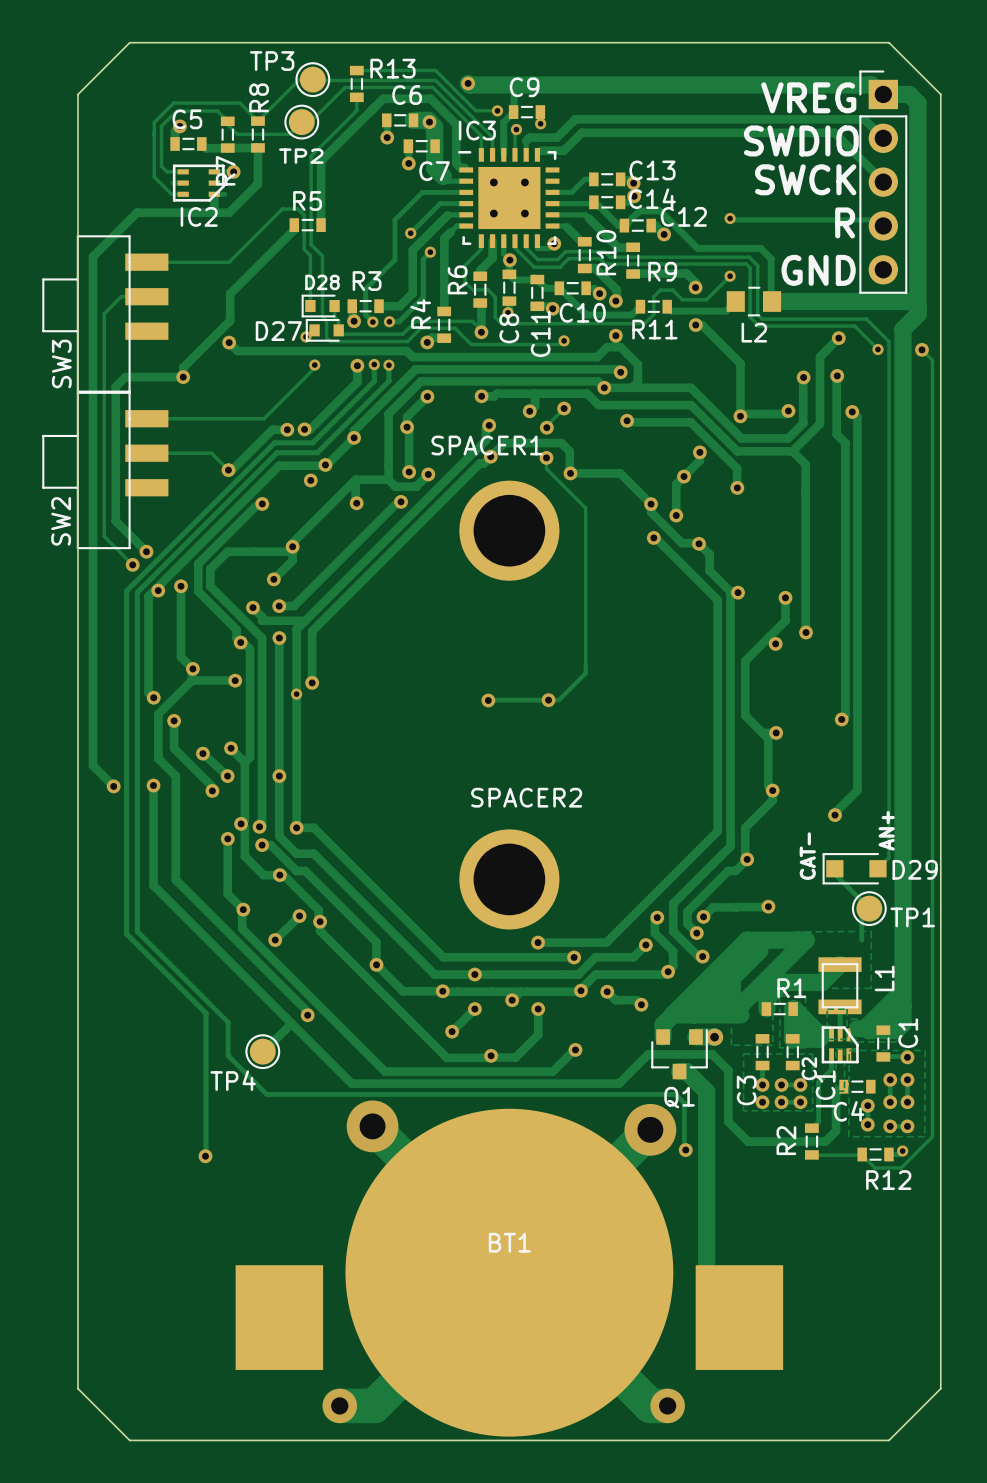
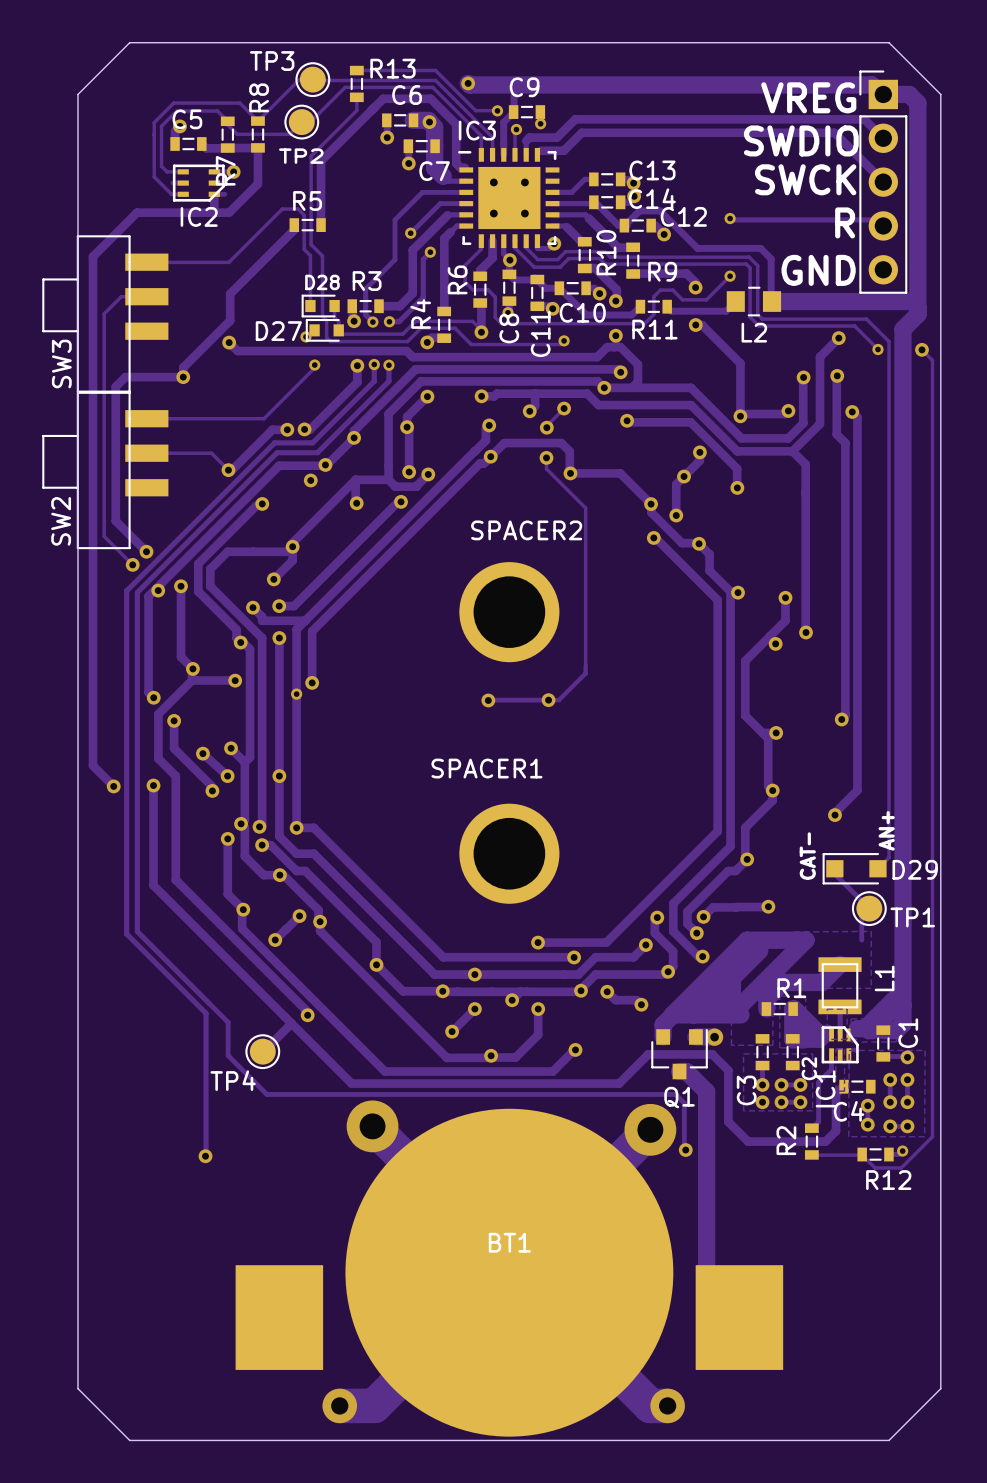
SPACER1 position: (509, 530) -> (509, 853)
SPACER2 position: (509, 879) -> (509, 612)

